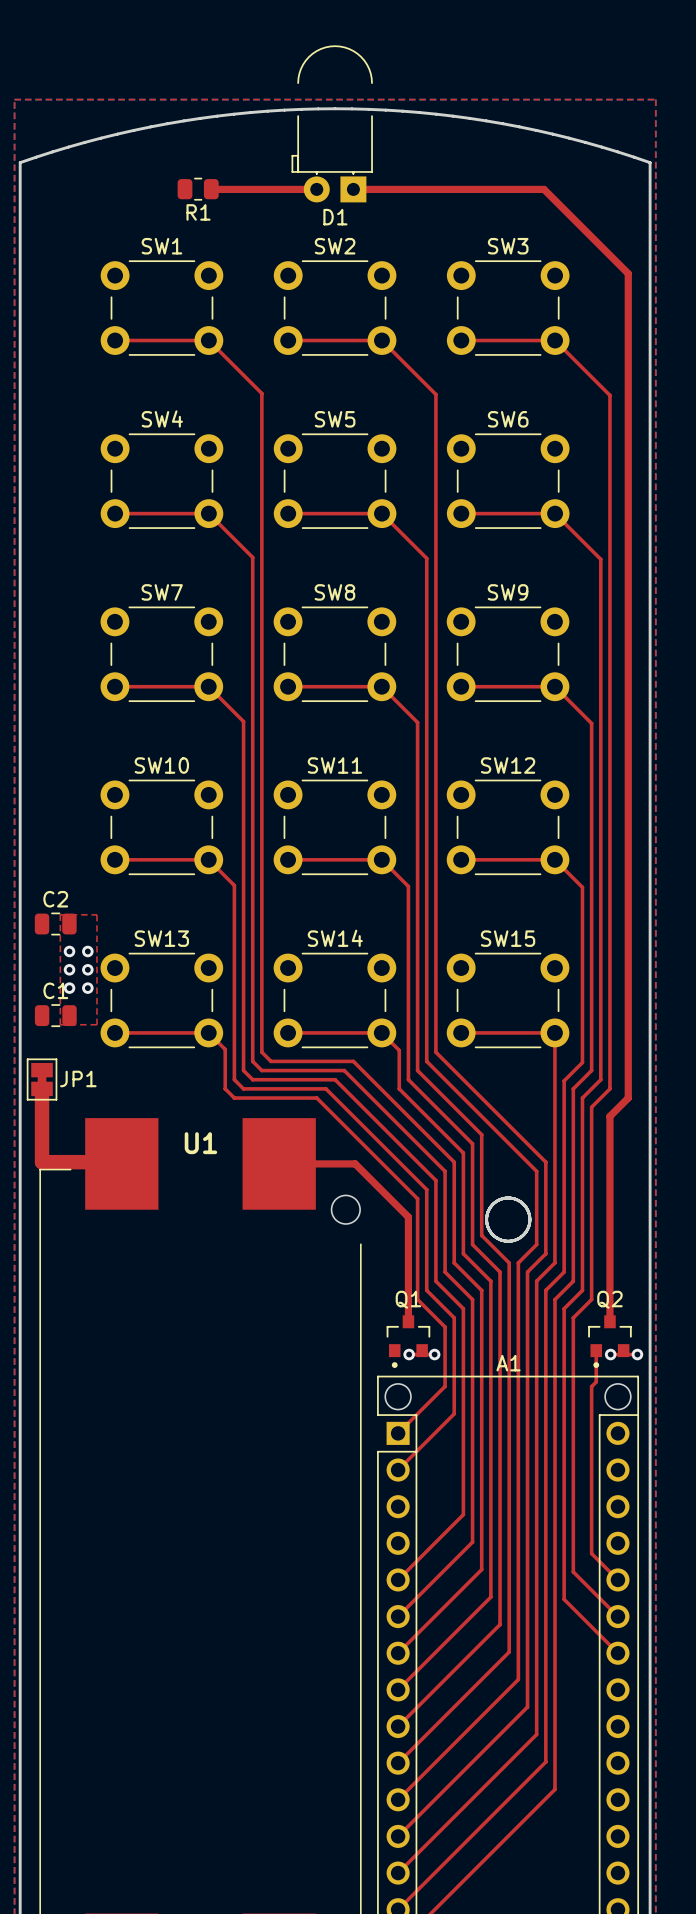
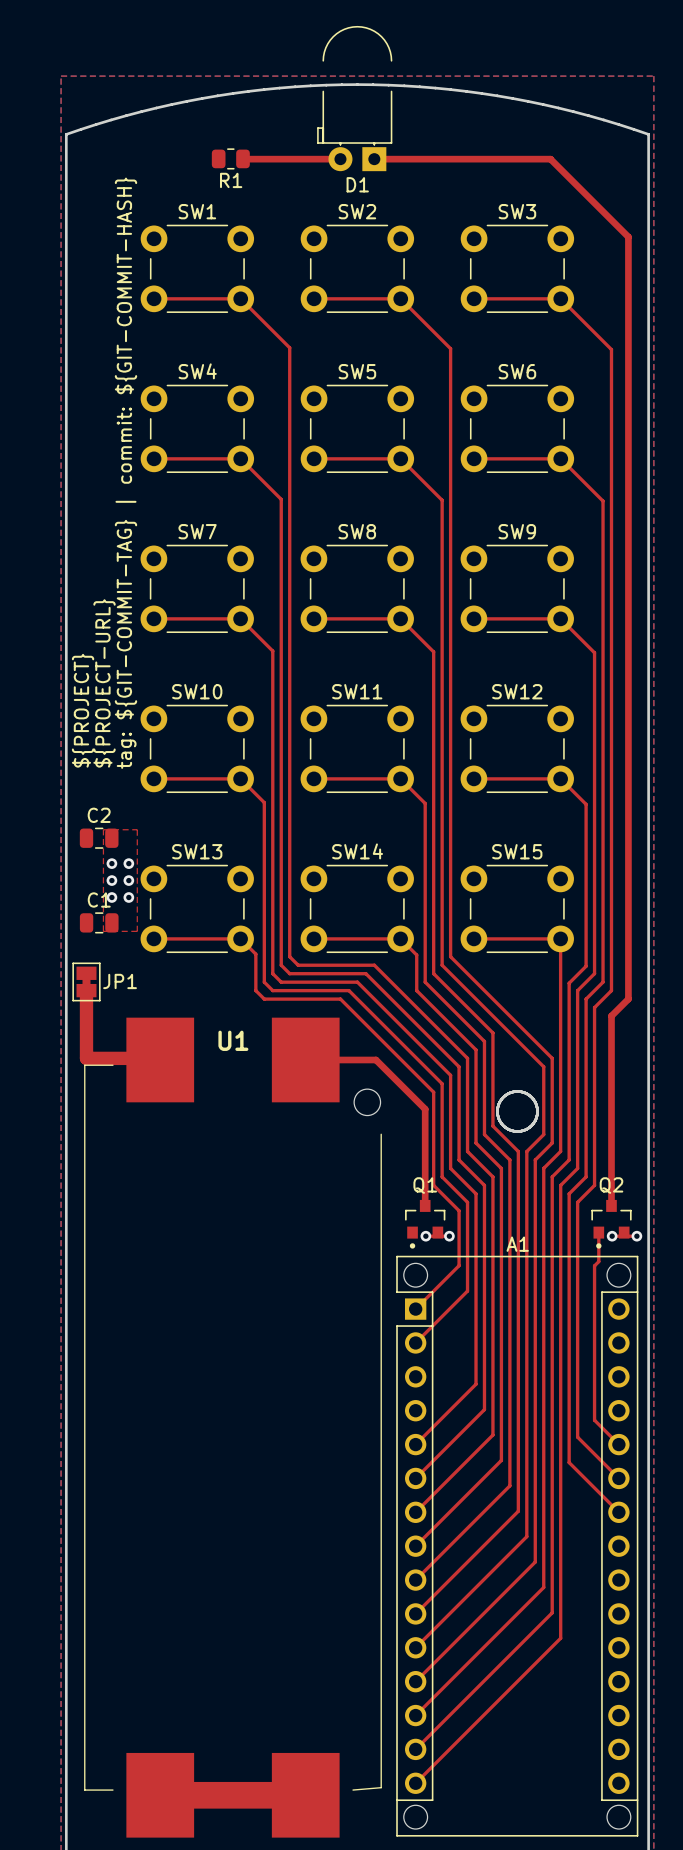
text: none -> tag: ${GIT-COMMIT-TAG} | commit: ${GIT-COMMIT-HASH} (125, 473)
text: none -> ${PROJECT-URL} (104, 683)
text: none -> ${PROJECT} (83, 710)

